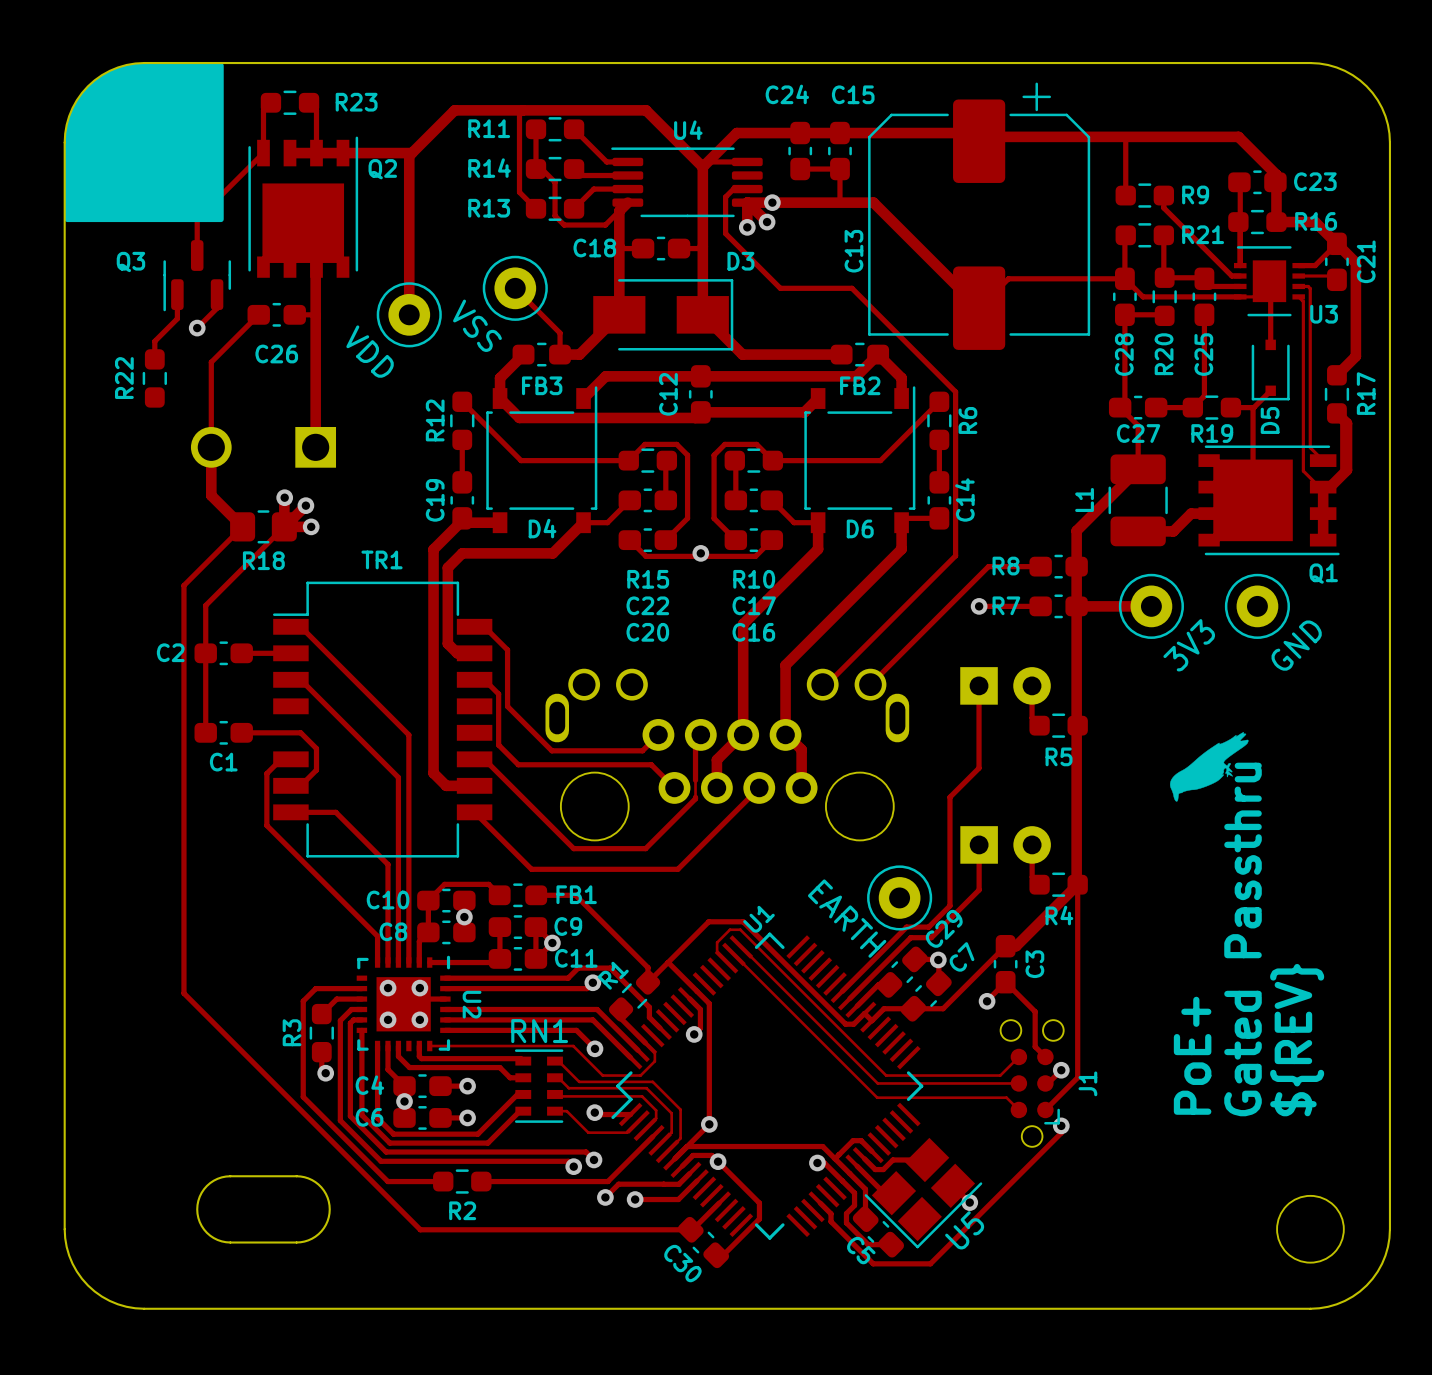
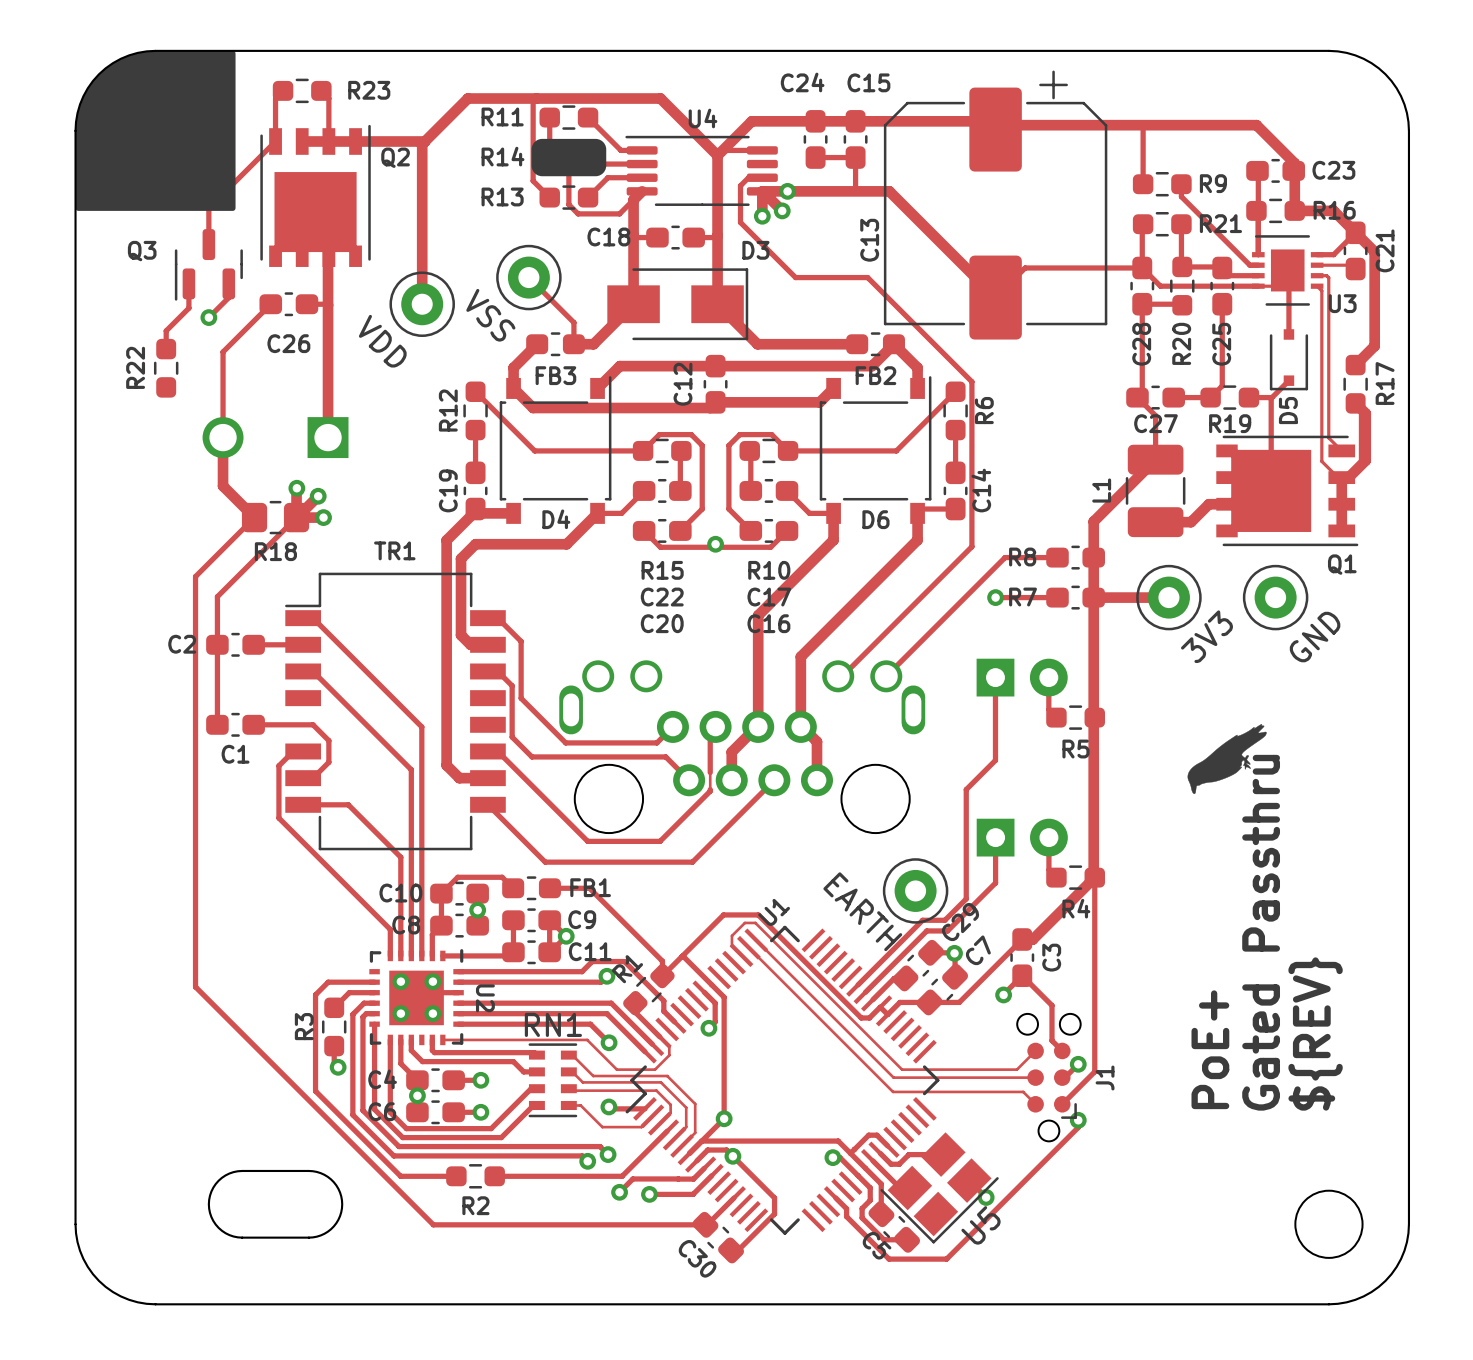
drawing: none -> [531, 138, 607, 177]

